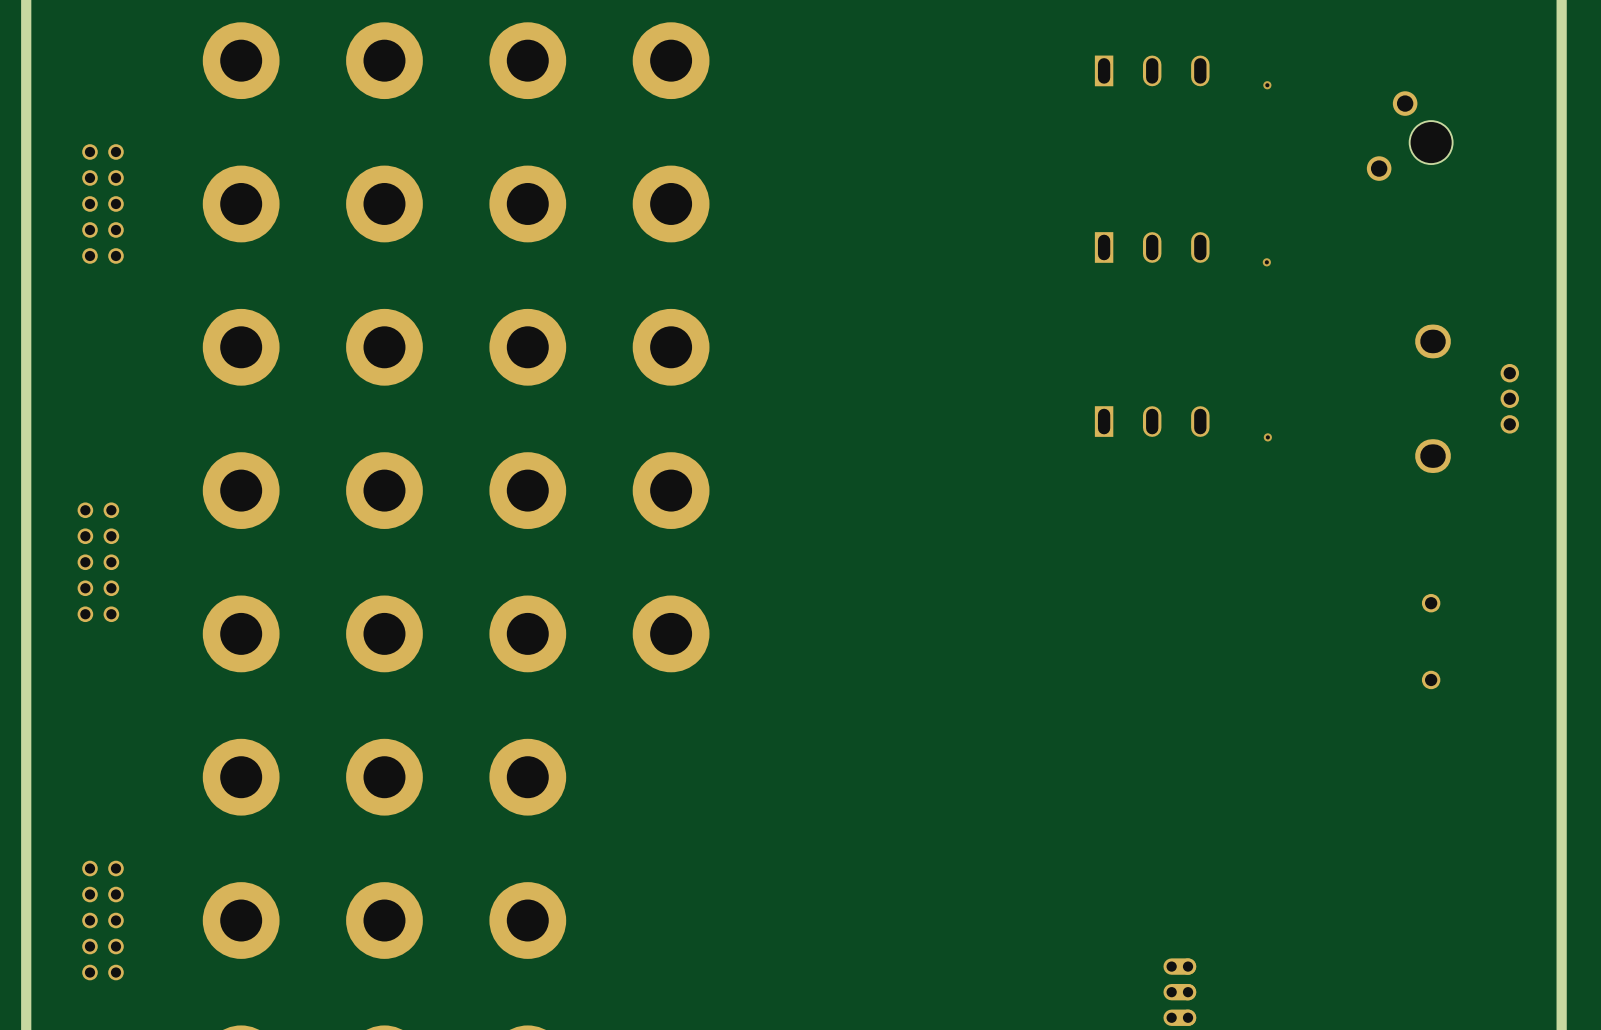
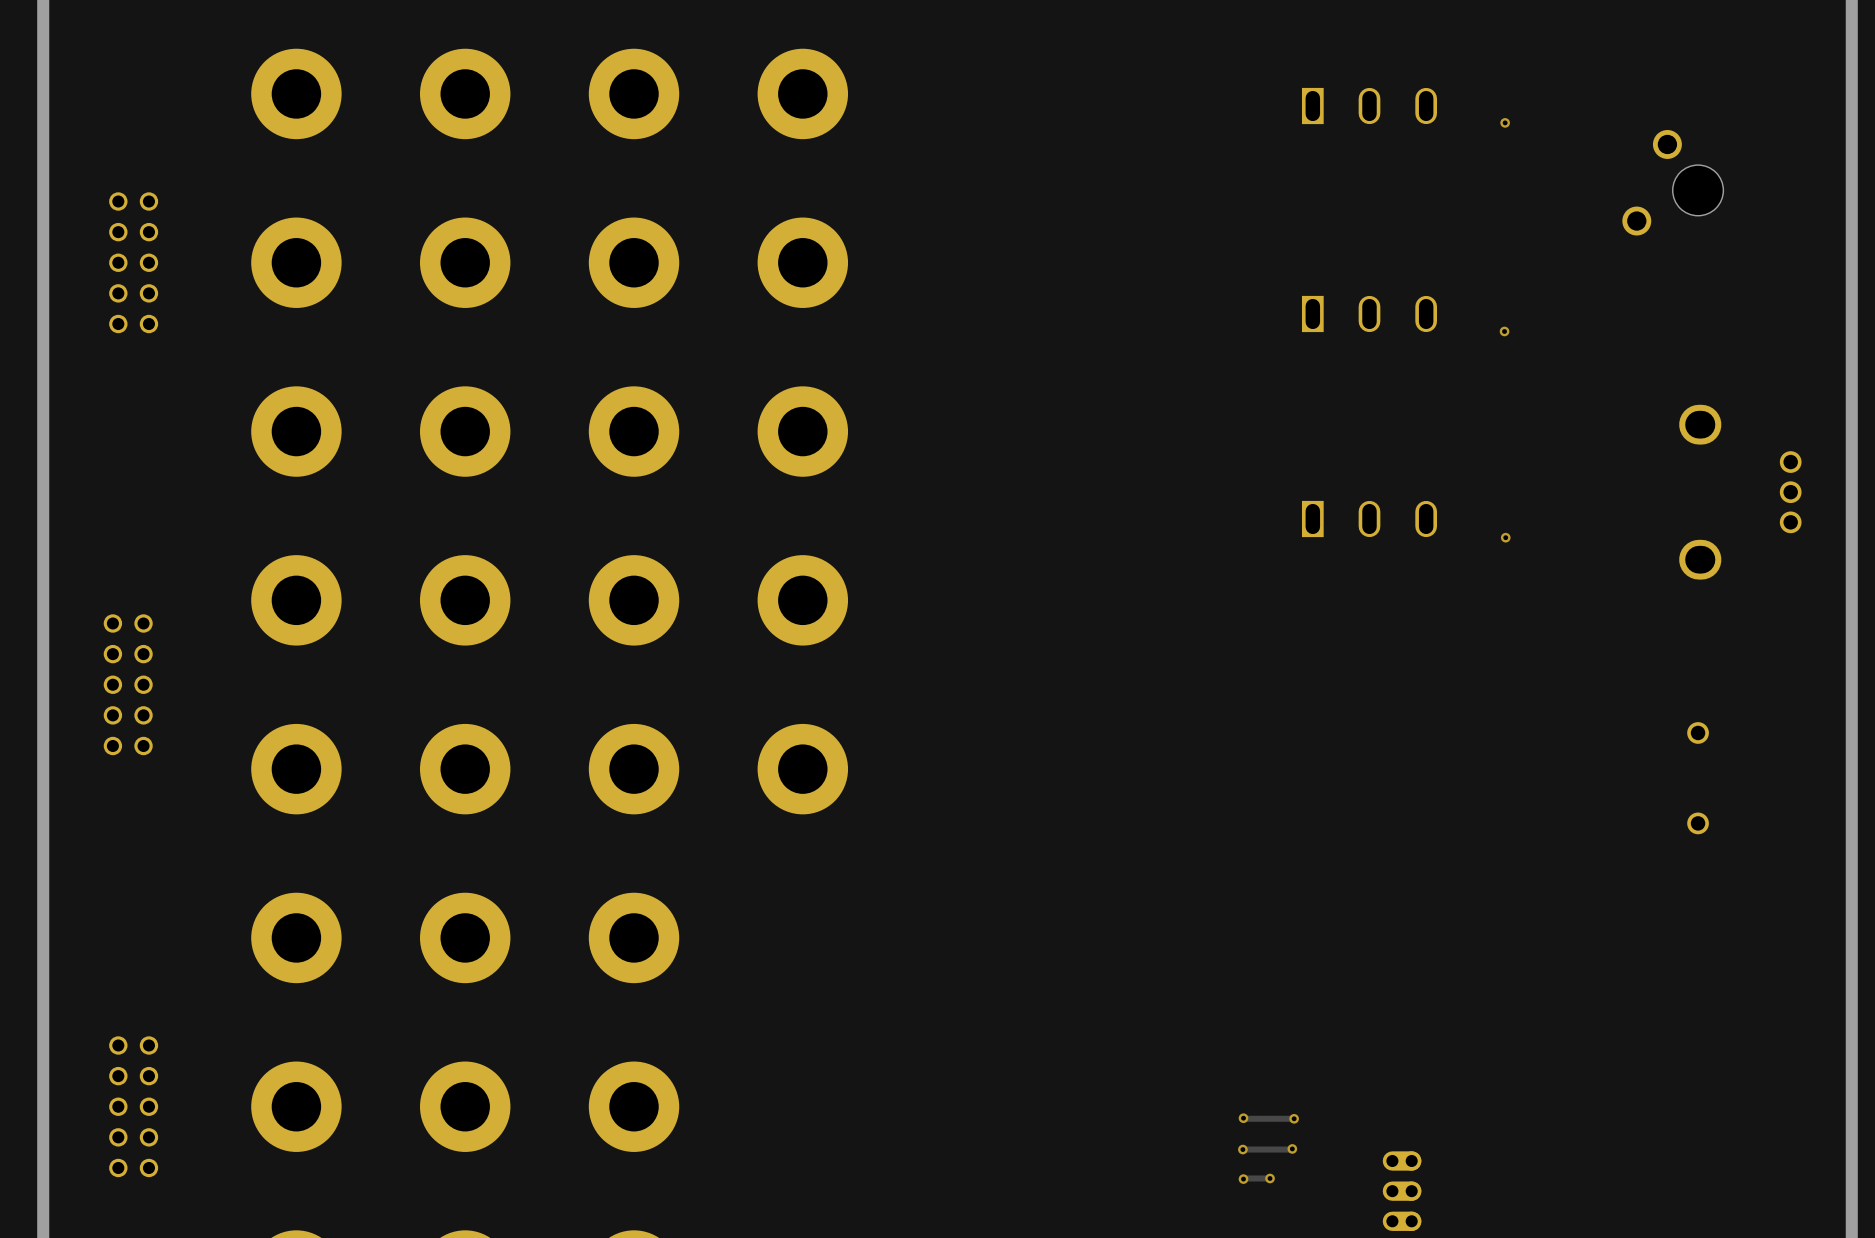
track: none -> (1243, 1118) (1294, 1118)
via: none -> (1243, 1118)
via: none -> (1294, 1118)
via: none -> (1242, 1149)
track: none -> (1292, 1148) (1242, 1149)
via: none -> (1292, 1148)
via: none -> (1243, 1179)
track: none -> (1270, 1178) (1243, 1179)
via: none -> (1270, 1178)

